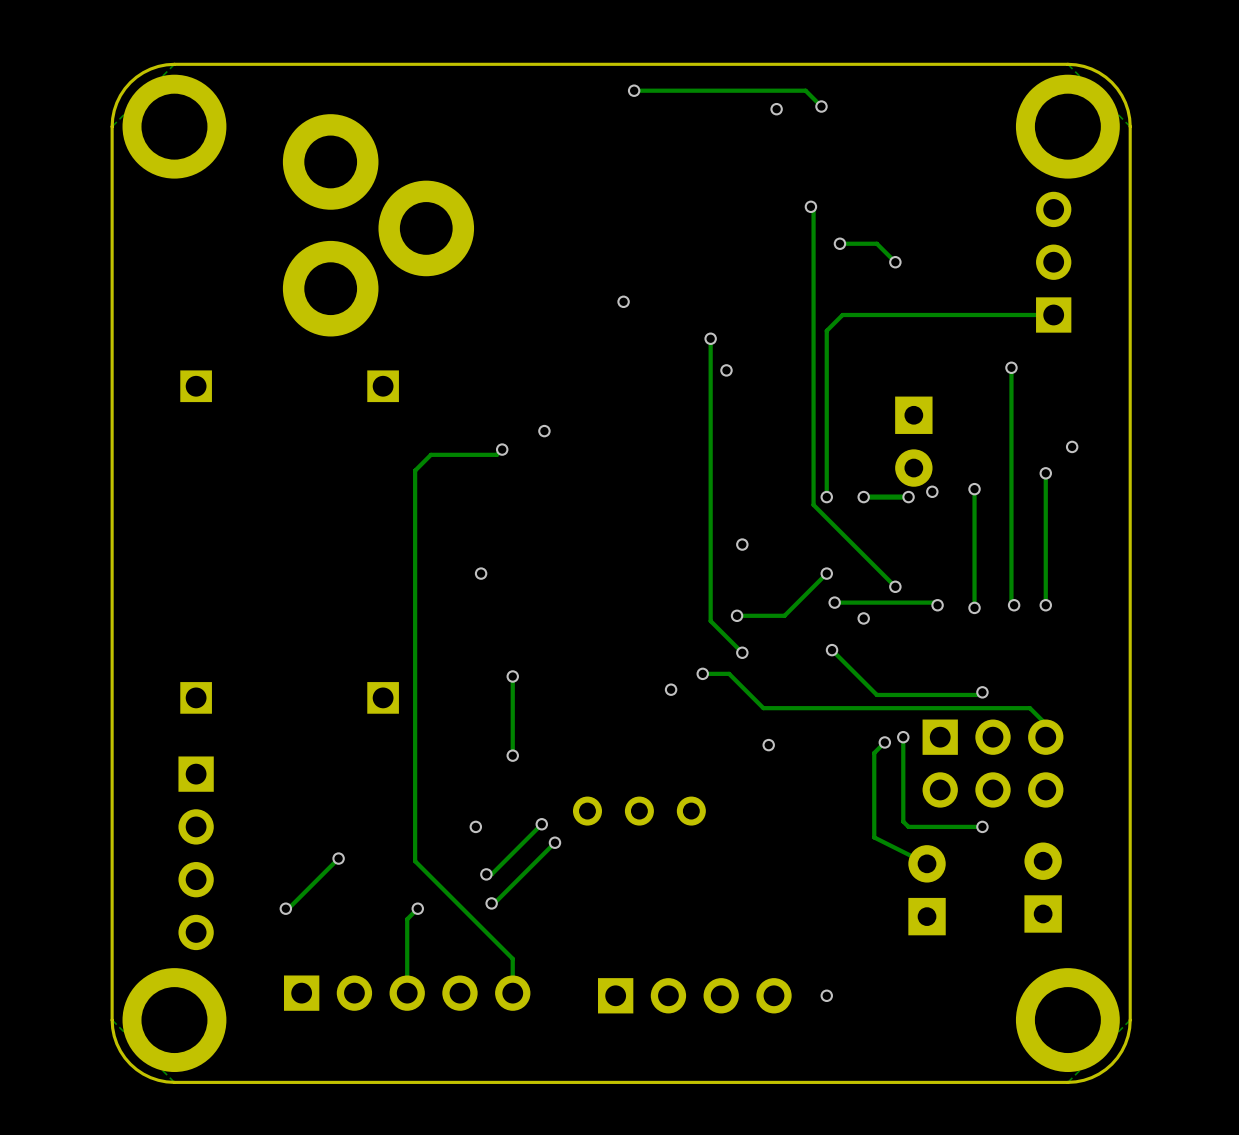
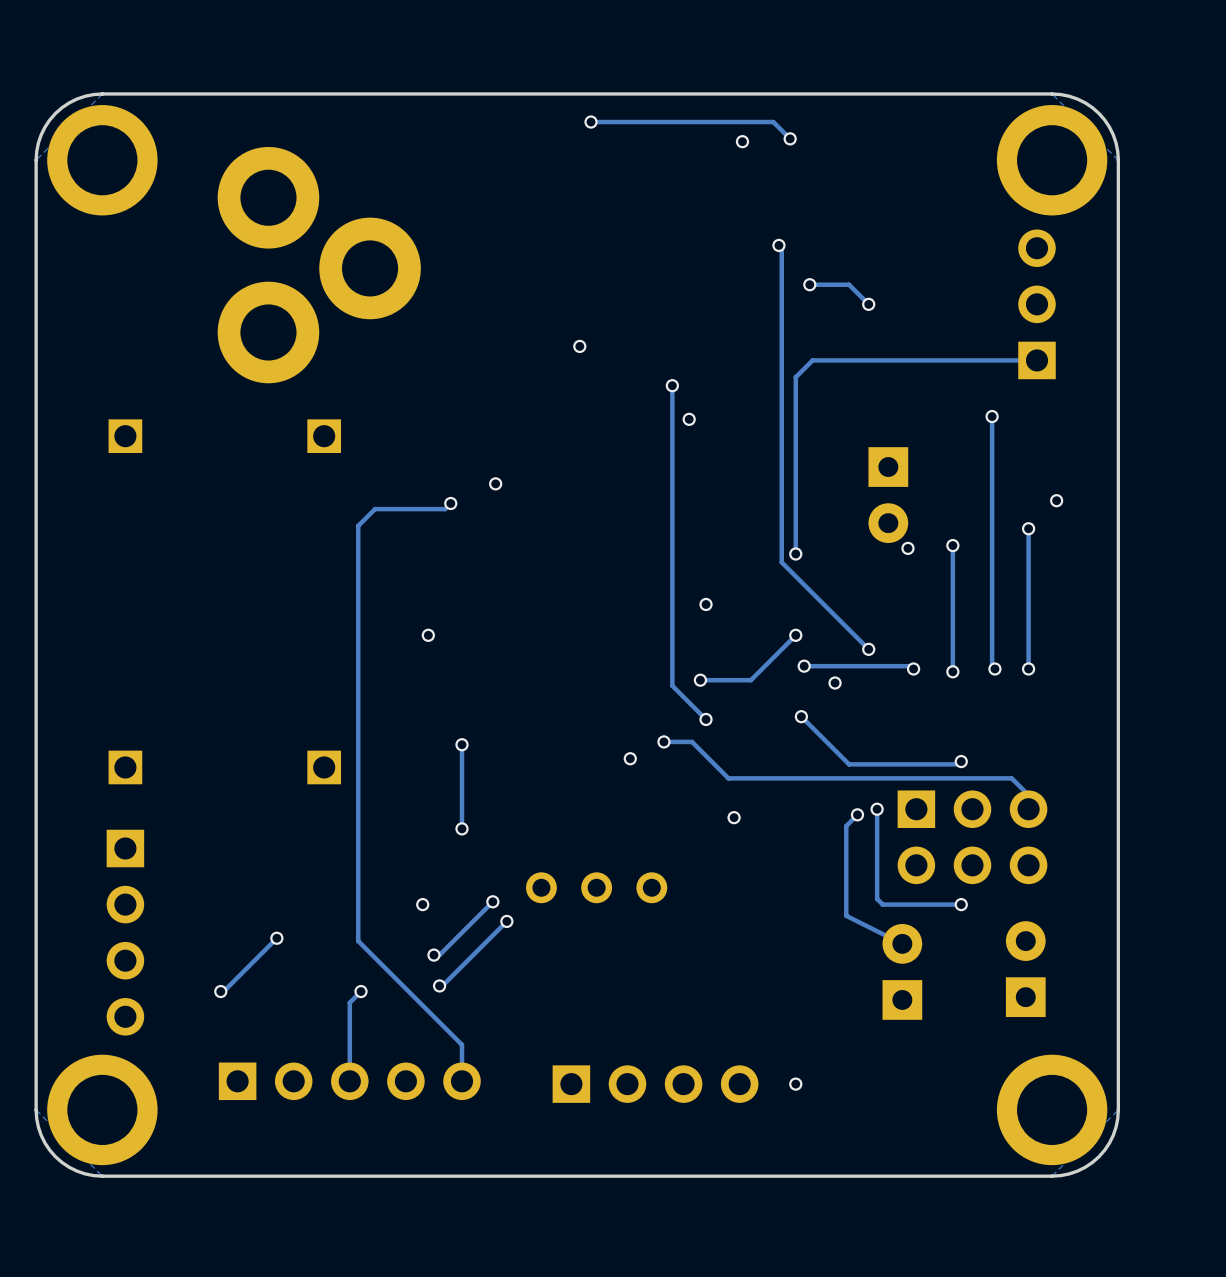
via: (863, 497) -> none
track: (908, 497) (863, 497) -> none
via: (908, 497) -> none

